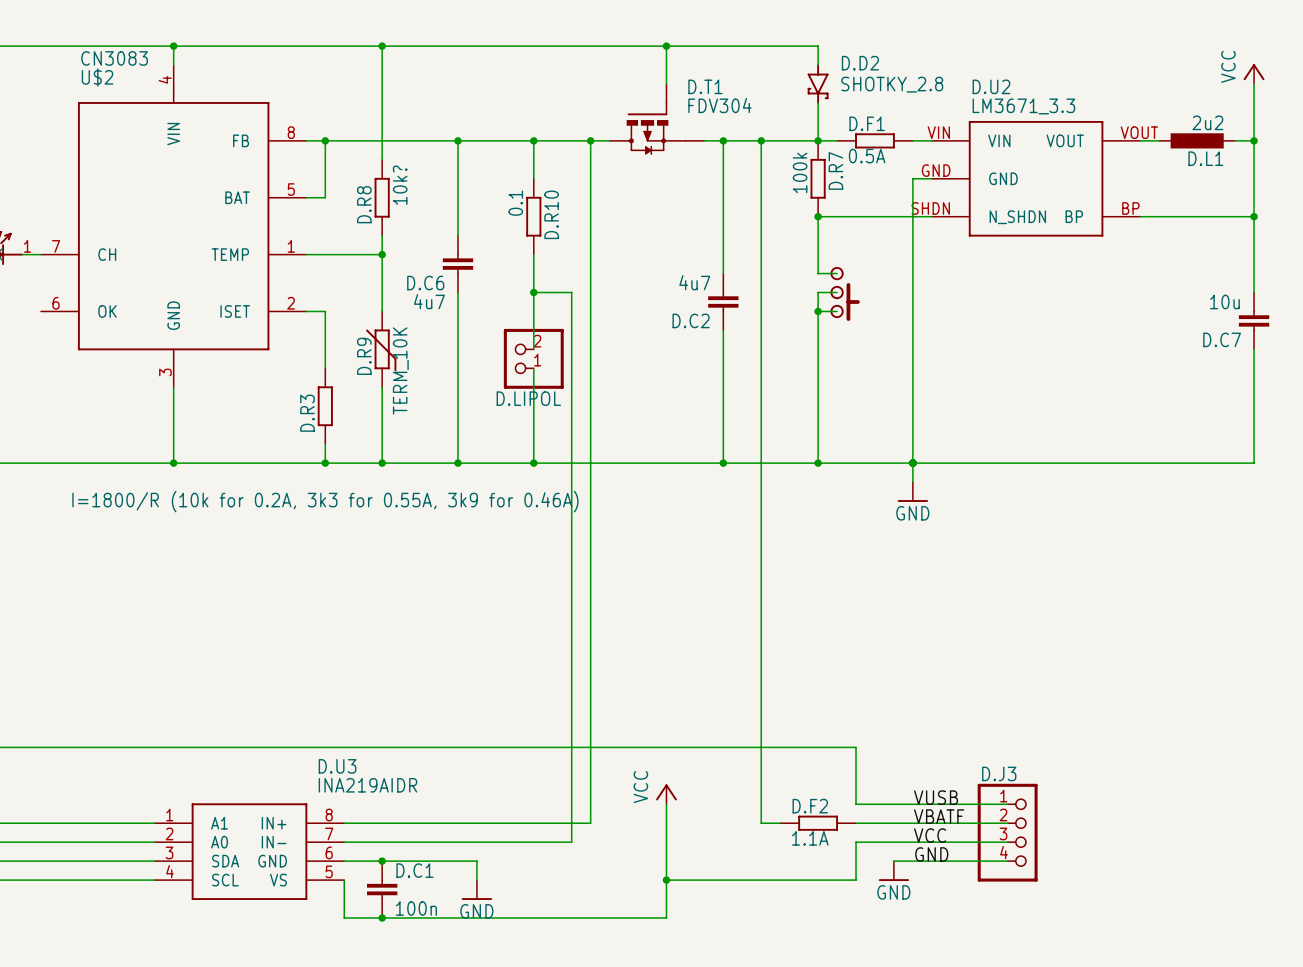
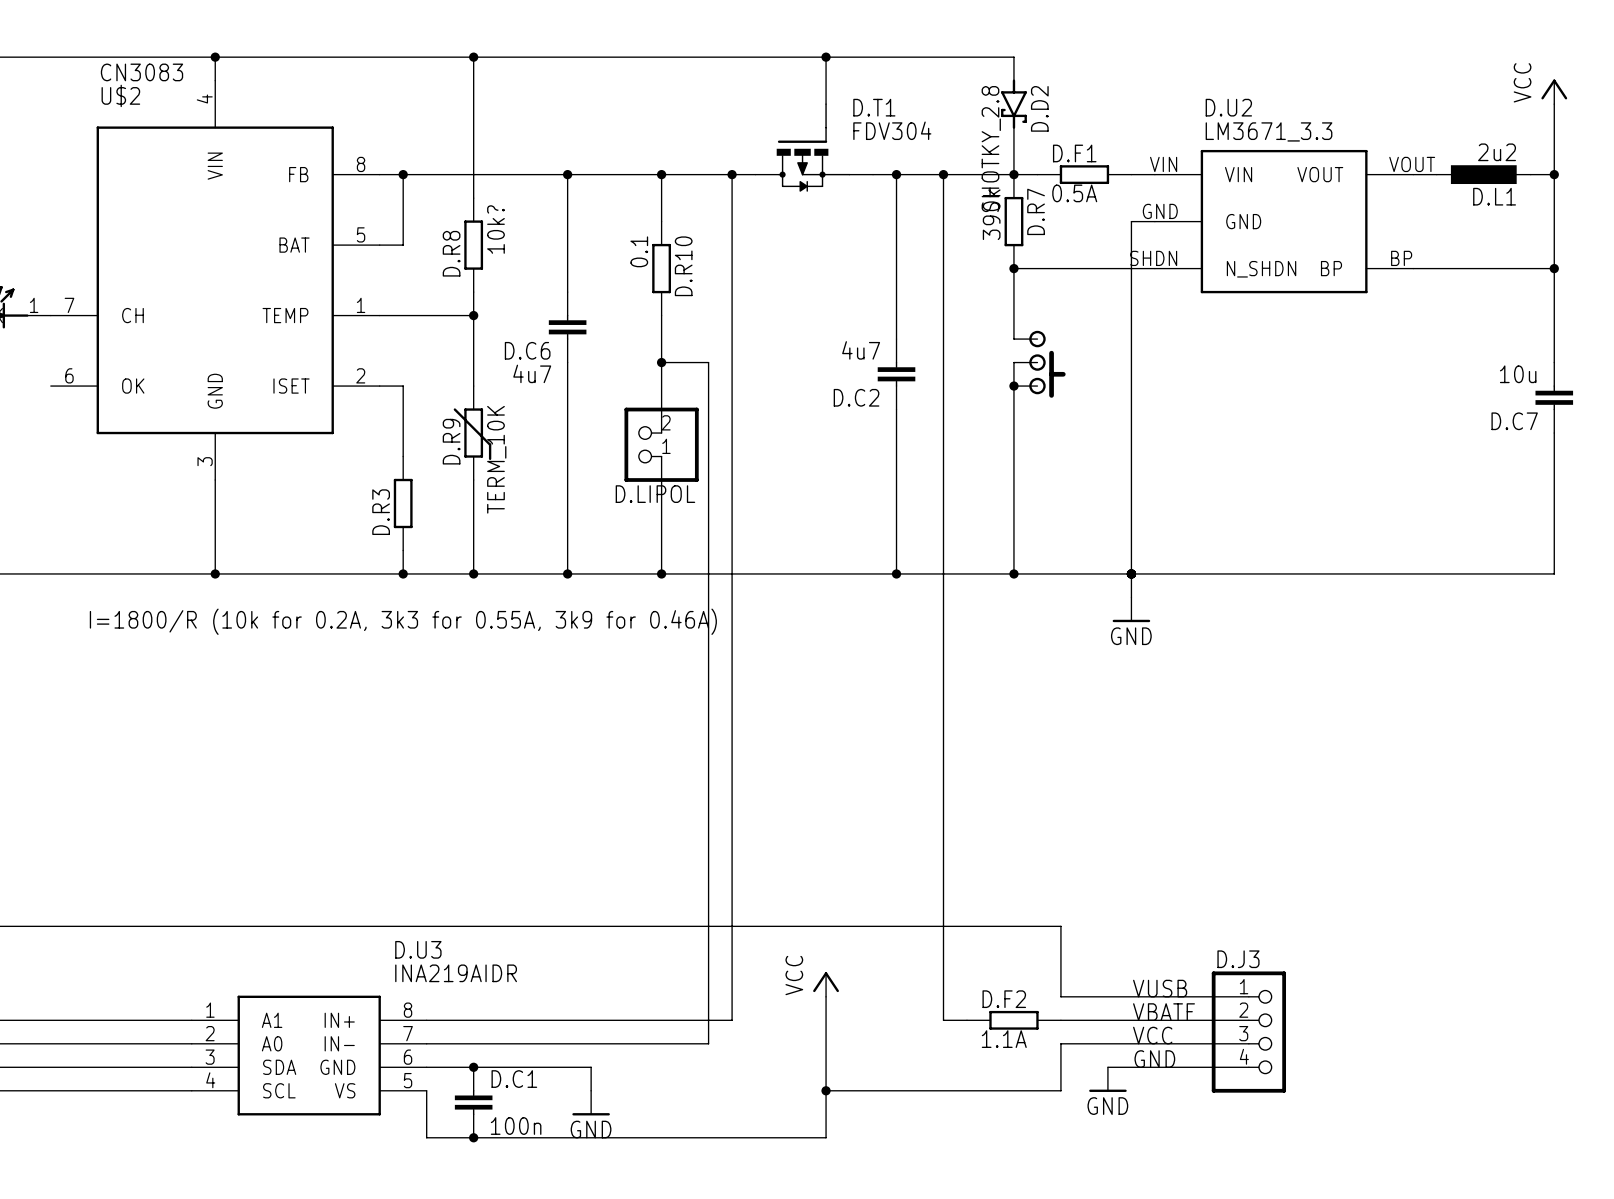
D.D2 name rotation: 0° (860, 63) -> 90° counterclockwise (1039, 108)
D.D2 value rotation: 0° (892, 84) -> 90° counterclockwise (991, 149)
D.R7 value: 100k (800, 172) -> 390k (991, 214)

